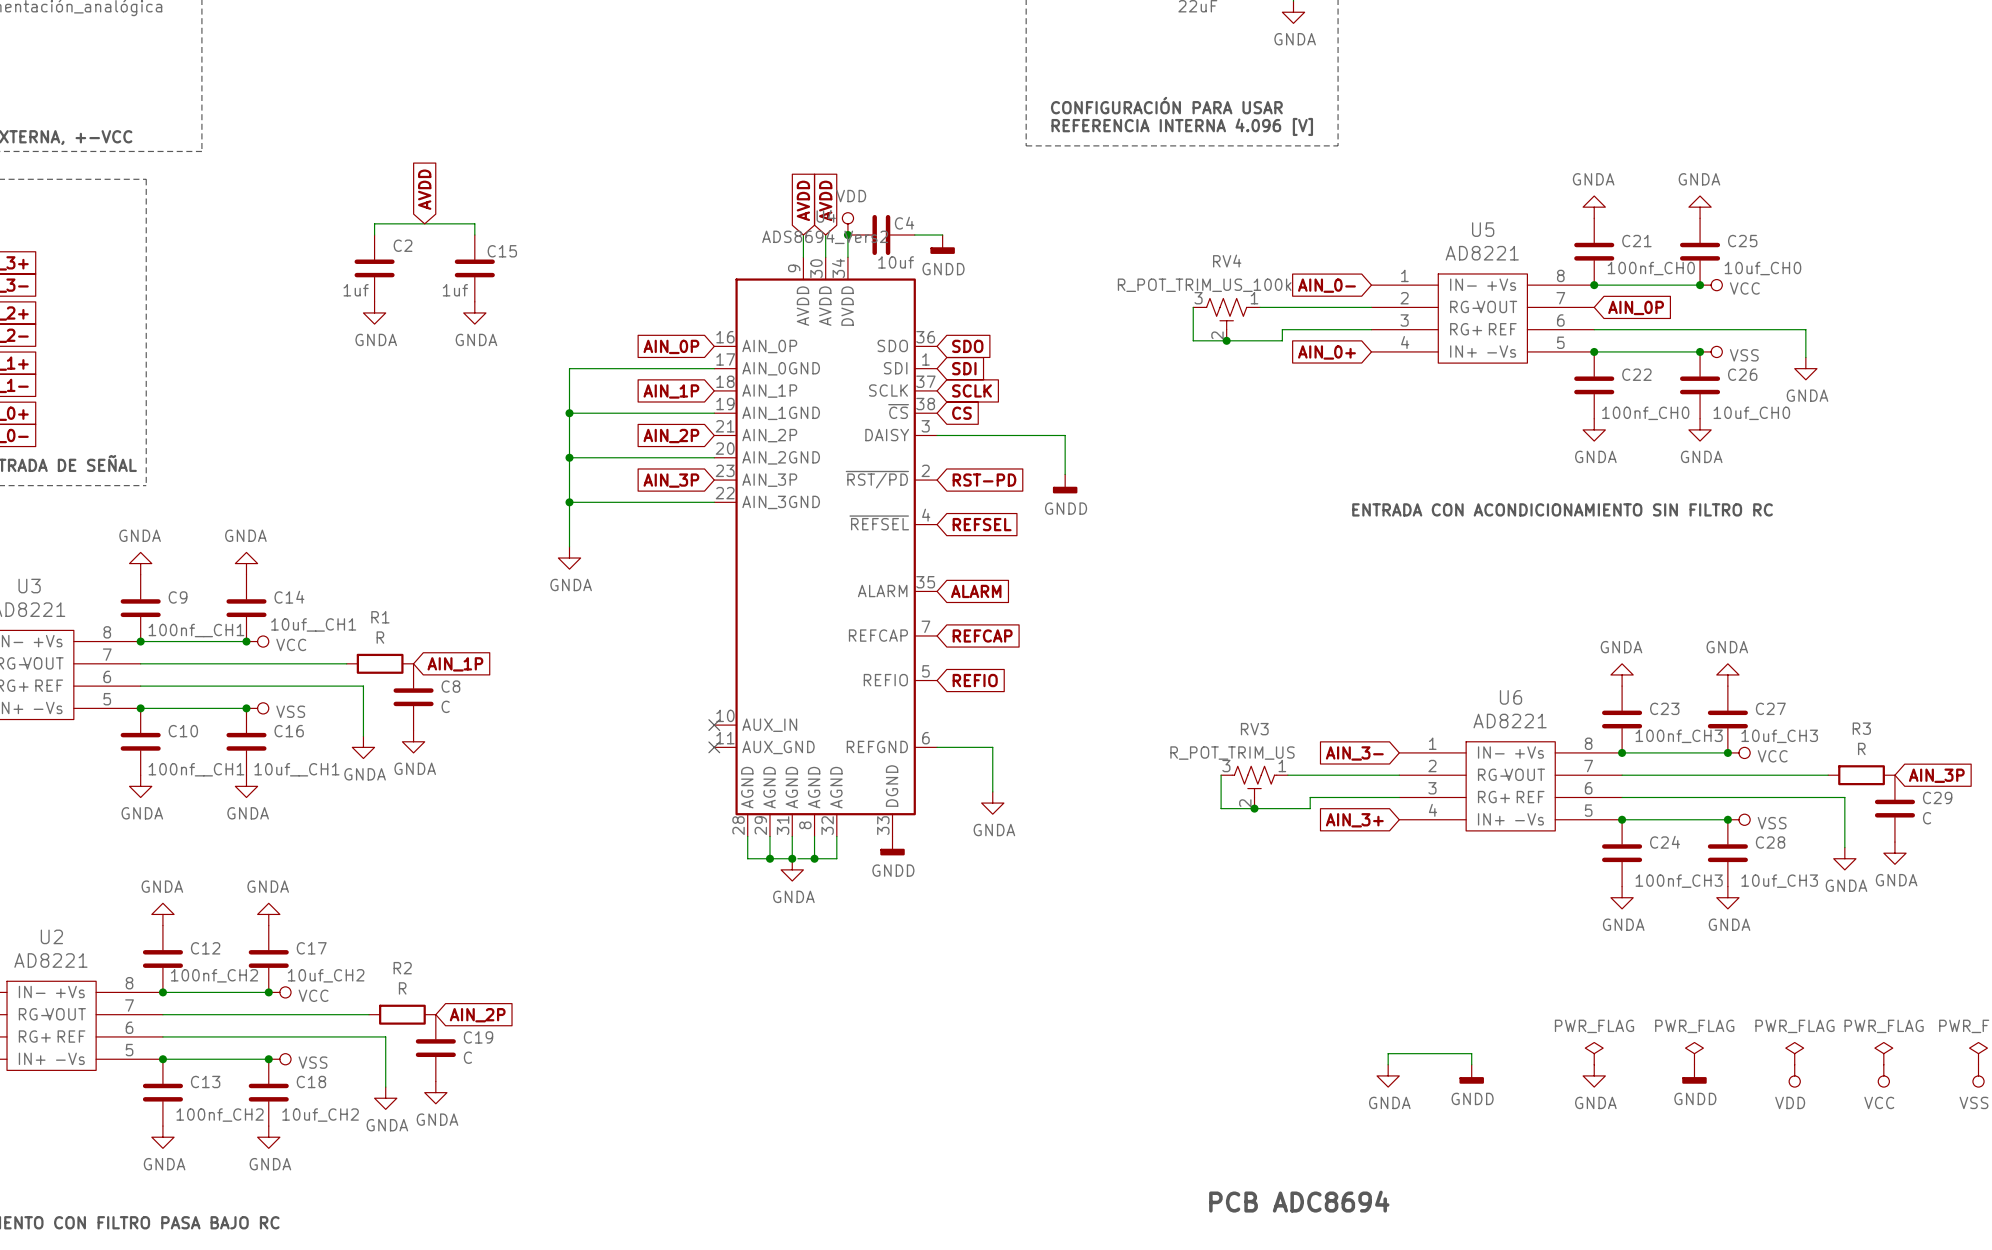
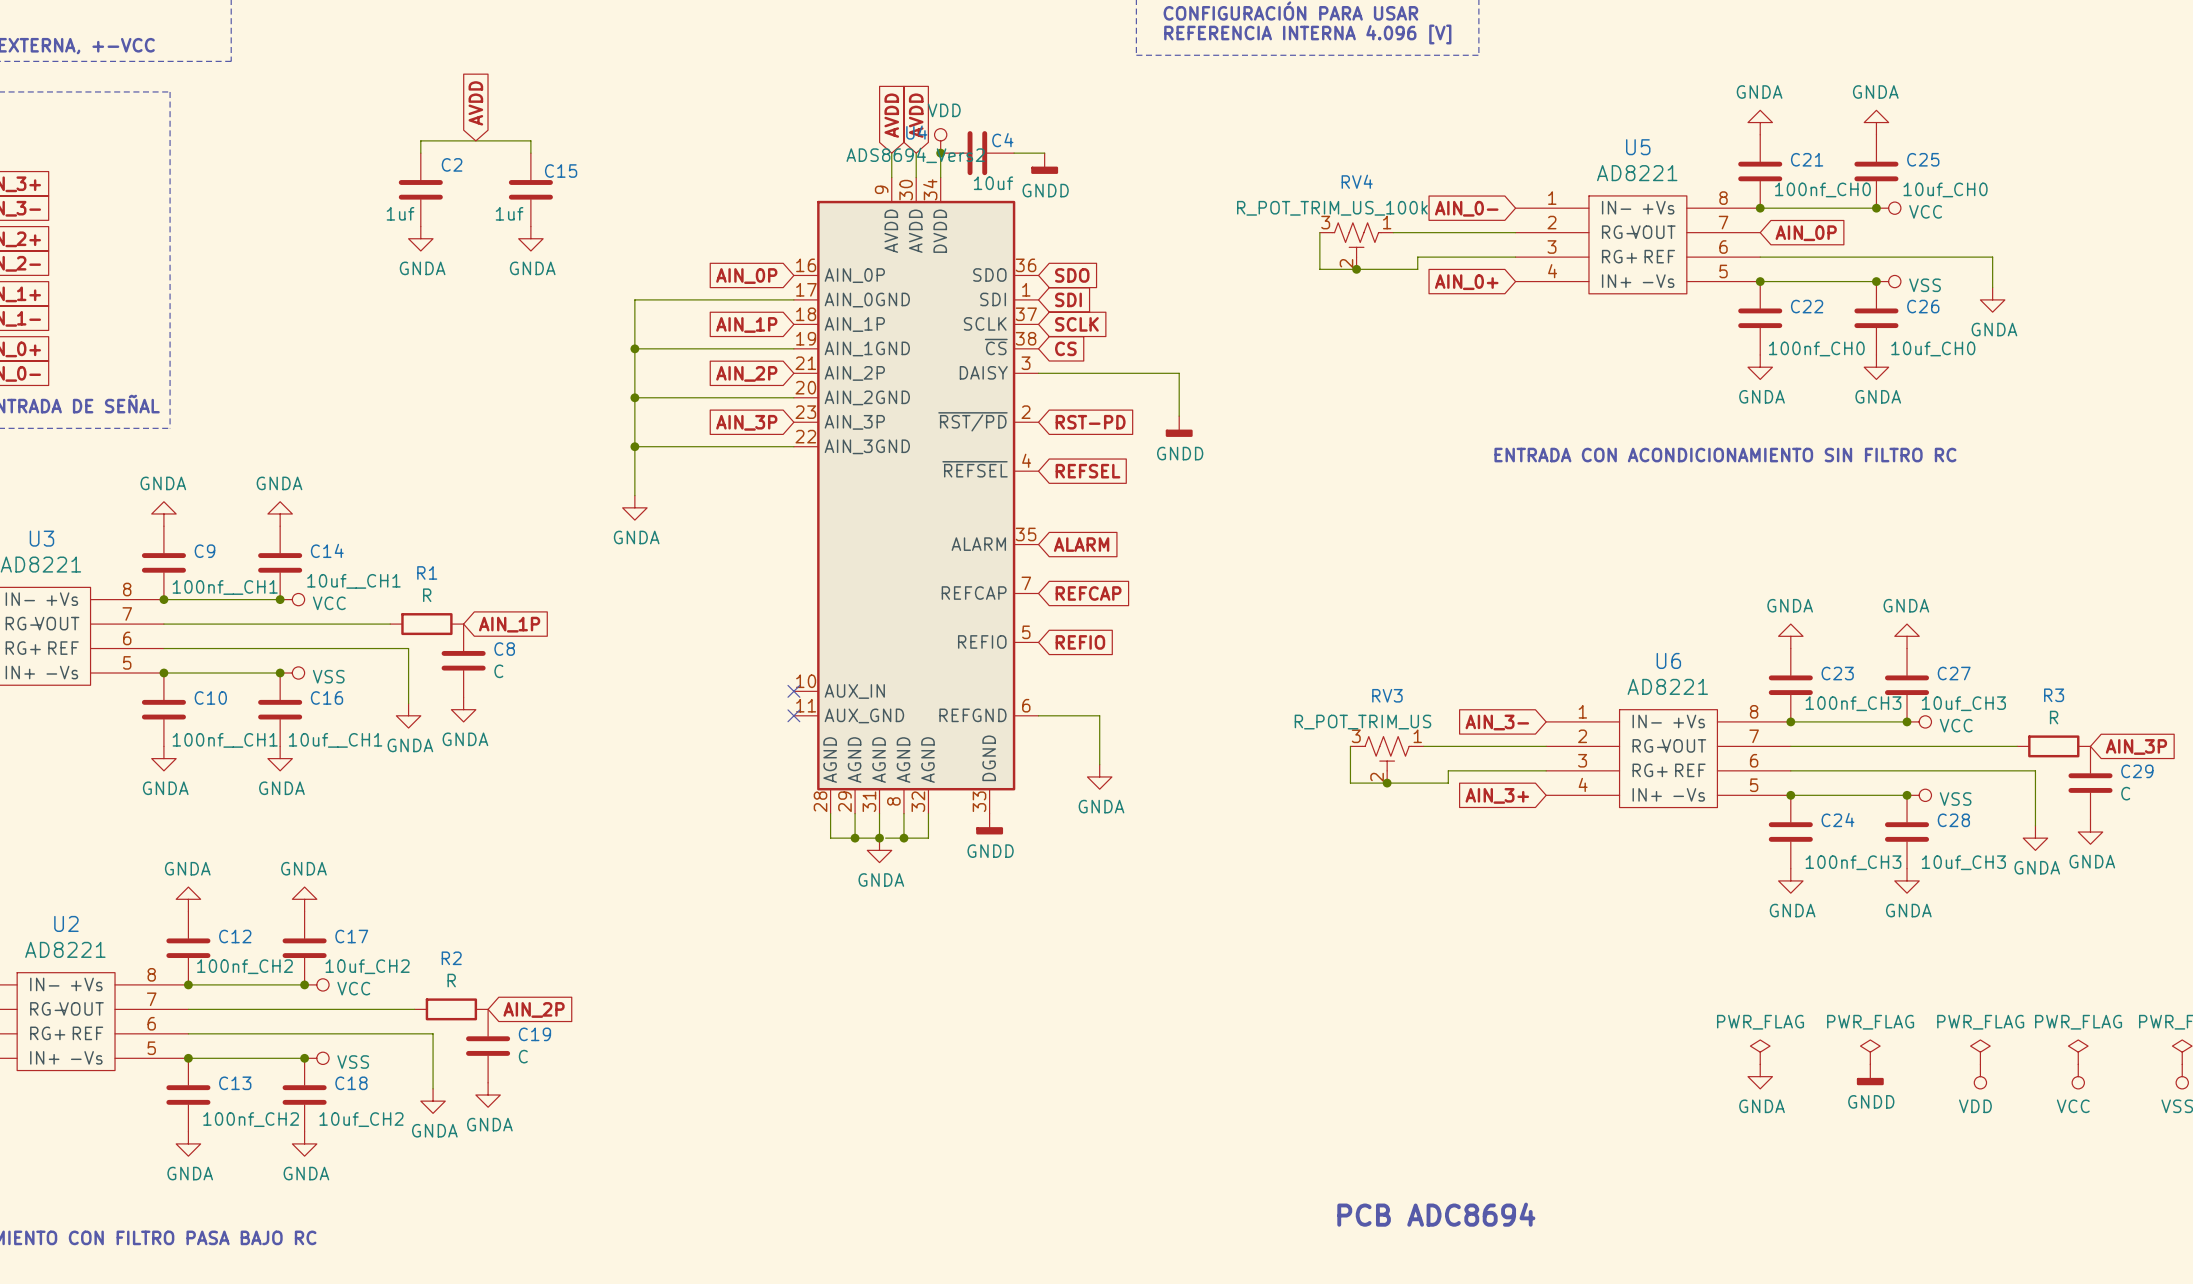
wire: (1388, 1064) (1388, 1053) (1471, 1053) (1471, 1064) -> none
power symbol: GNDD (1471, 1074) -> none
power symbol: GNDA (1388, 1075) -> none

